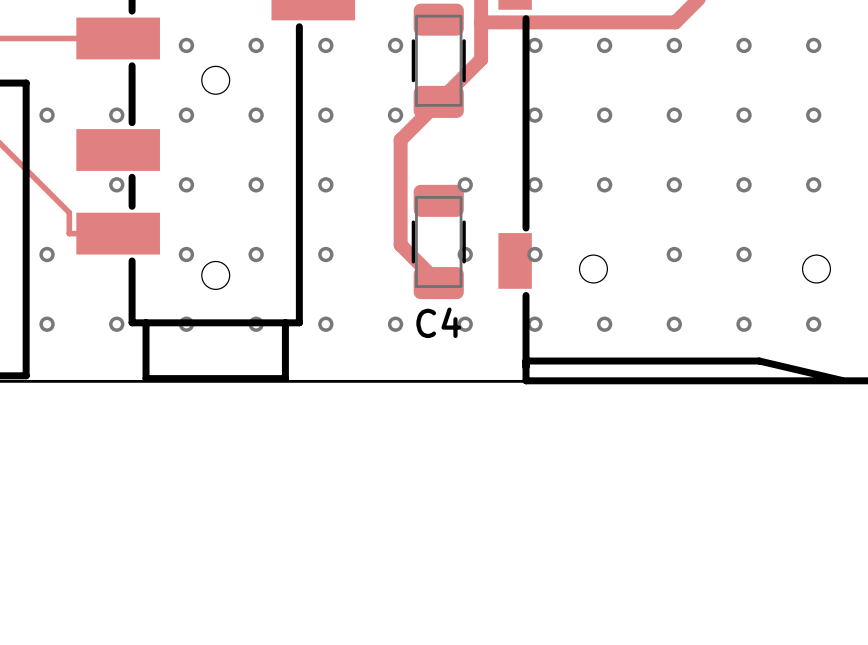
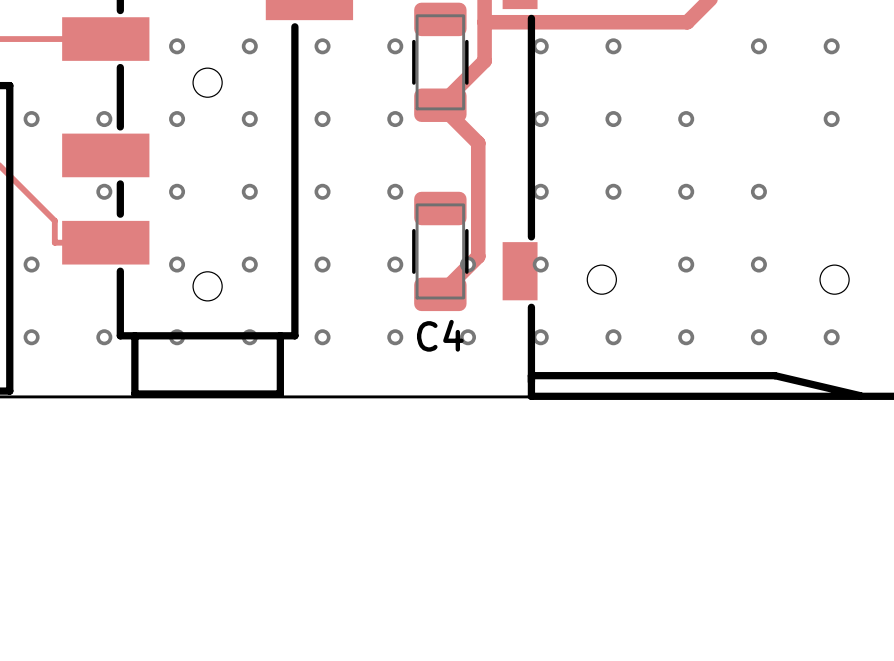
via: (674, 45) -> none
top track: (438, 101) (400, 140) (400, 244) (438, 283) -> (440, 105) (478, 143) (478, 256) (440, 294)
via: (744, 115) -> none
via: none -> (395, 191)
via: (465, 184) -> none
via: (813, 184) -> none
via: none -> (395, 264)

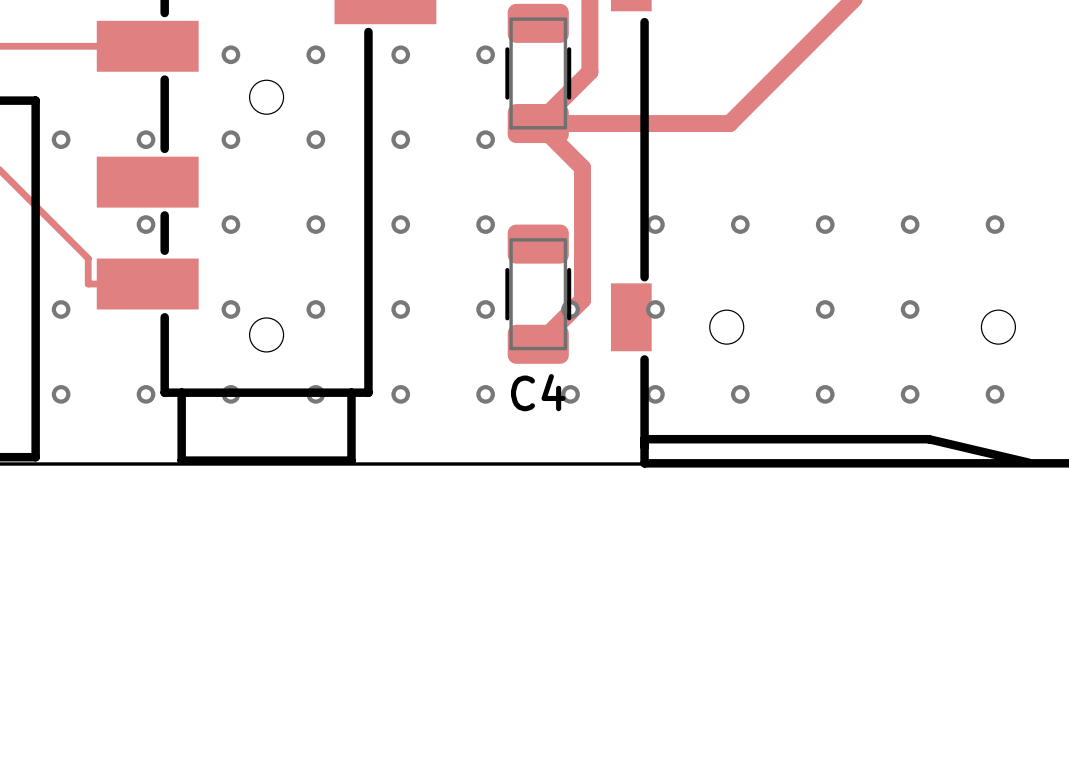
top track: (484, 22) (687, 22) -> (538, 123) (729, 123) (826, 26)
via: (540, 46) -> none
via: (613, 46) -> none
via: (758, 46) -> none
via: (831, 46) -> none
via: (540, 119) -> none
via: (613, 119) -> none
via: (686, 119) -> none
via: (831, 119) -> none
via: none -> (995, 224)

